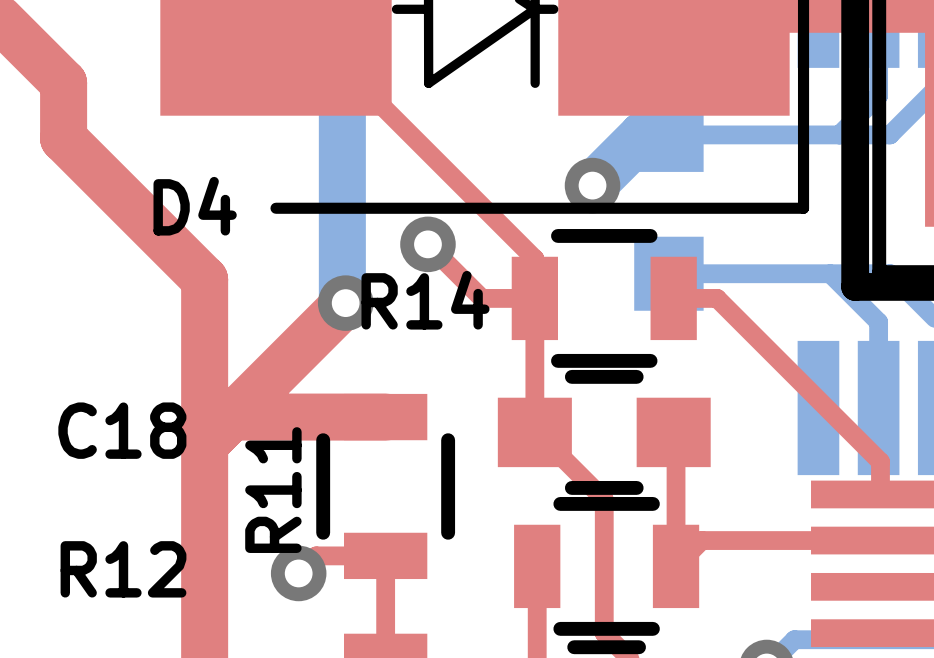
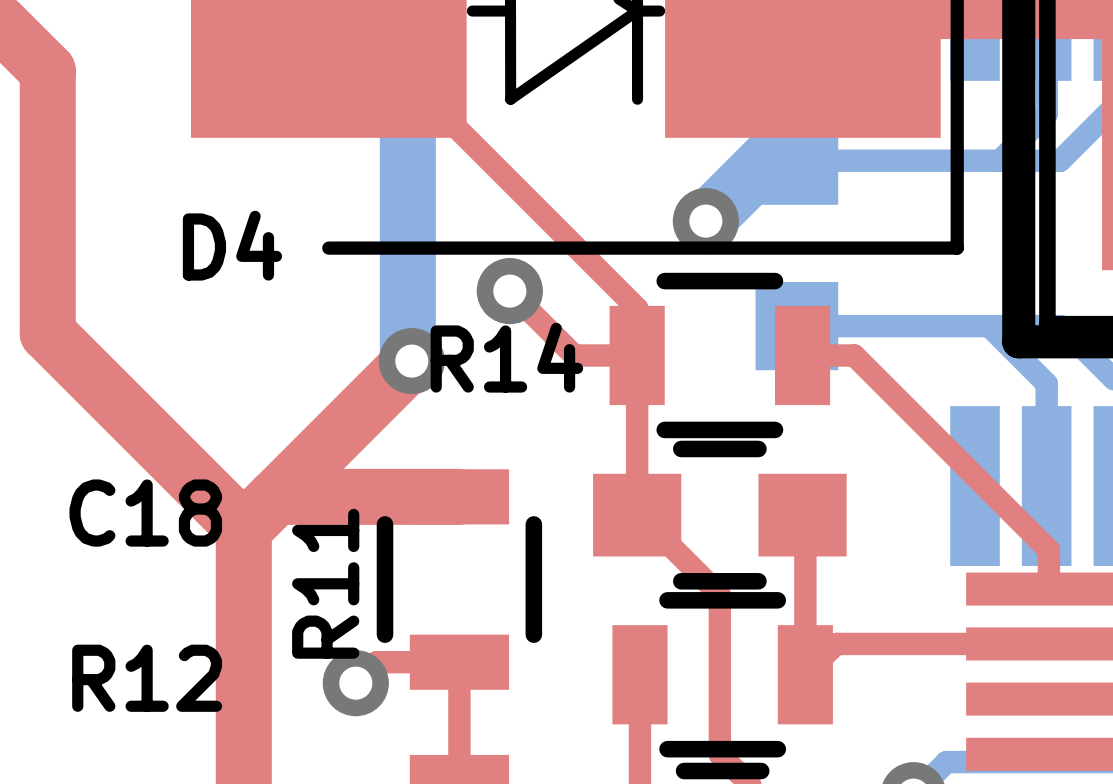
top track: (40, 59) (63, 82) (63, 138) (204, 279) (204, 444) -> (47, 70) (47, 333) (243, 529)

